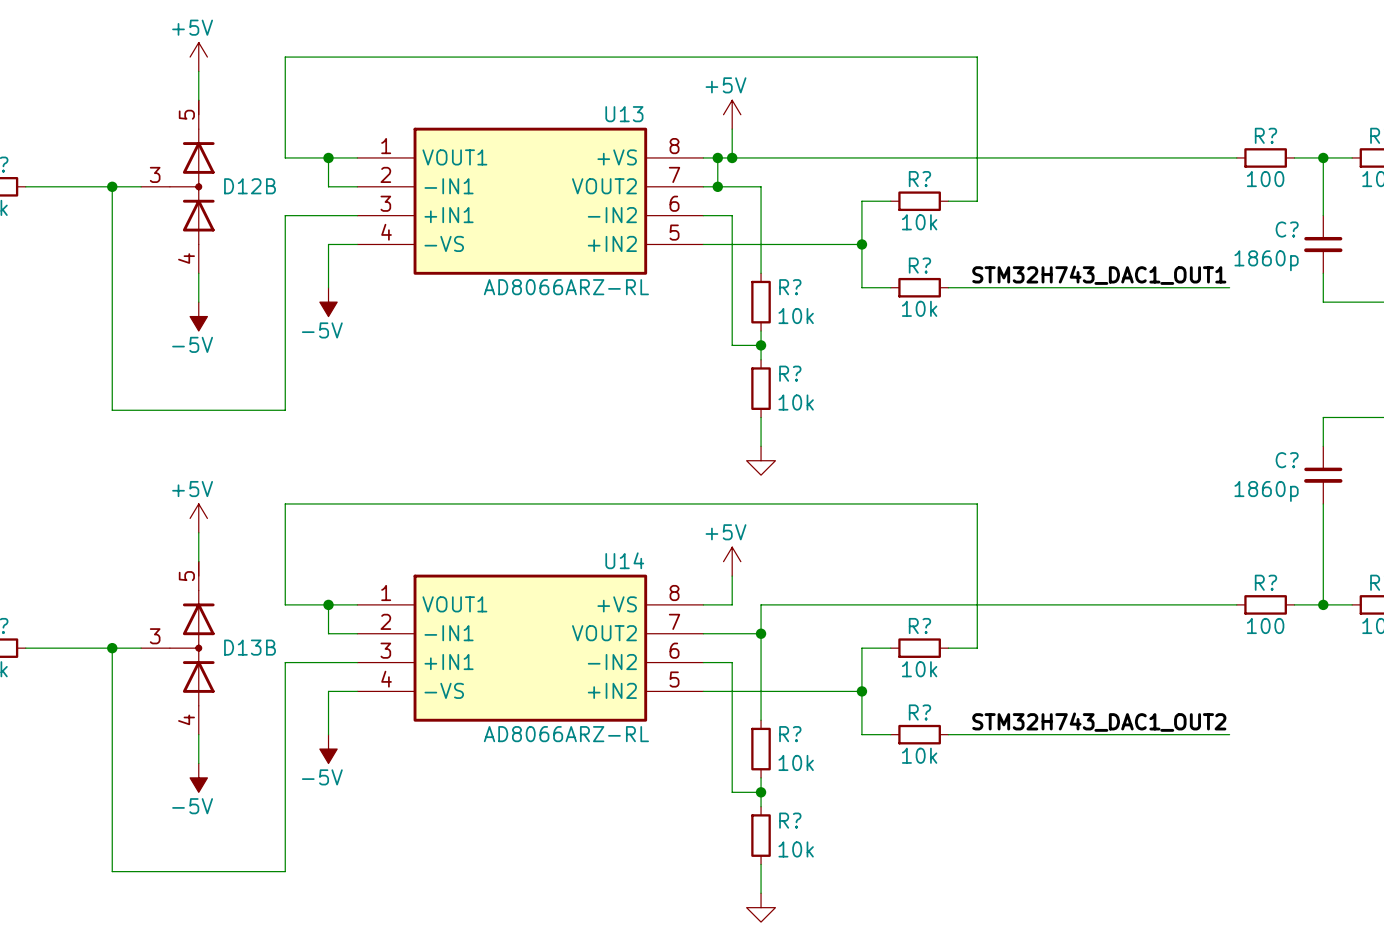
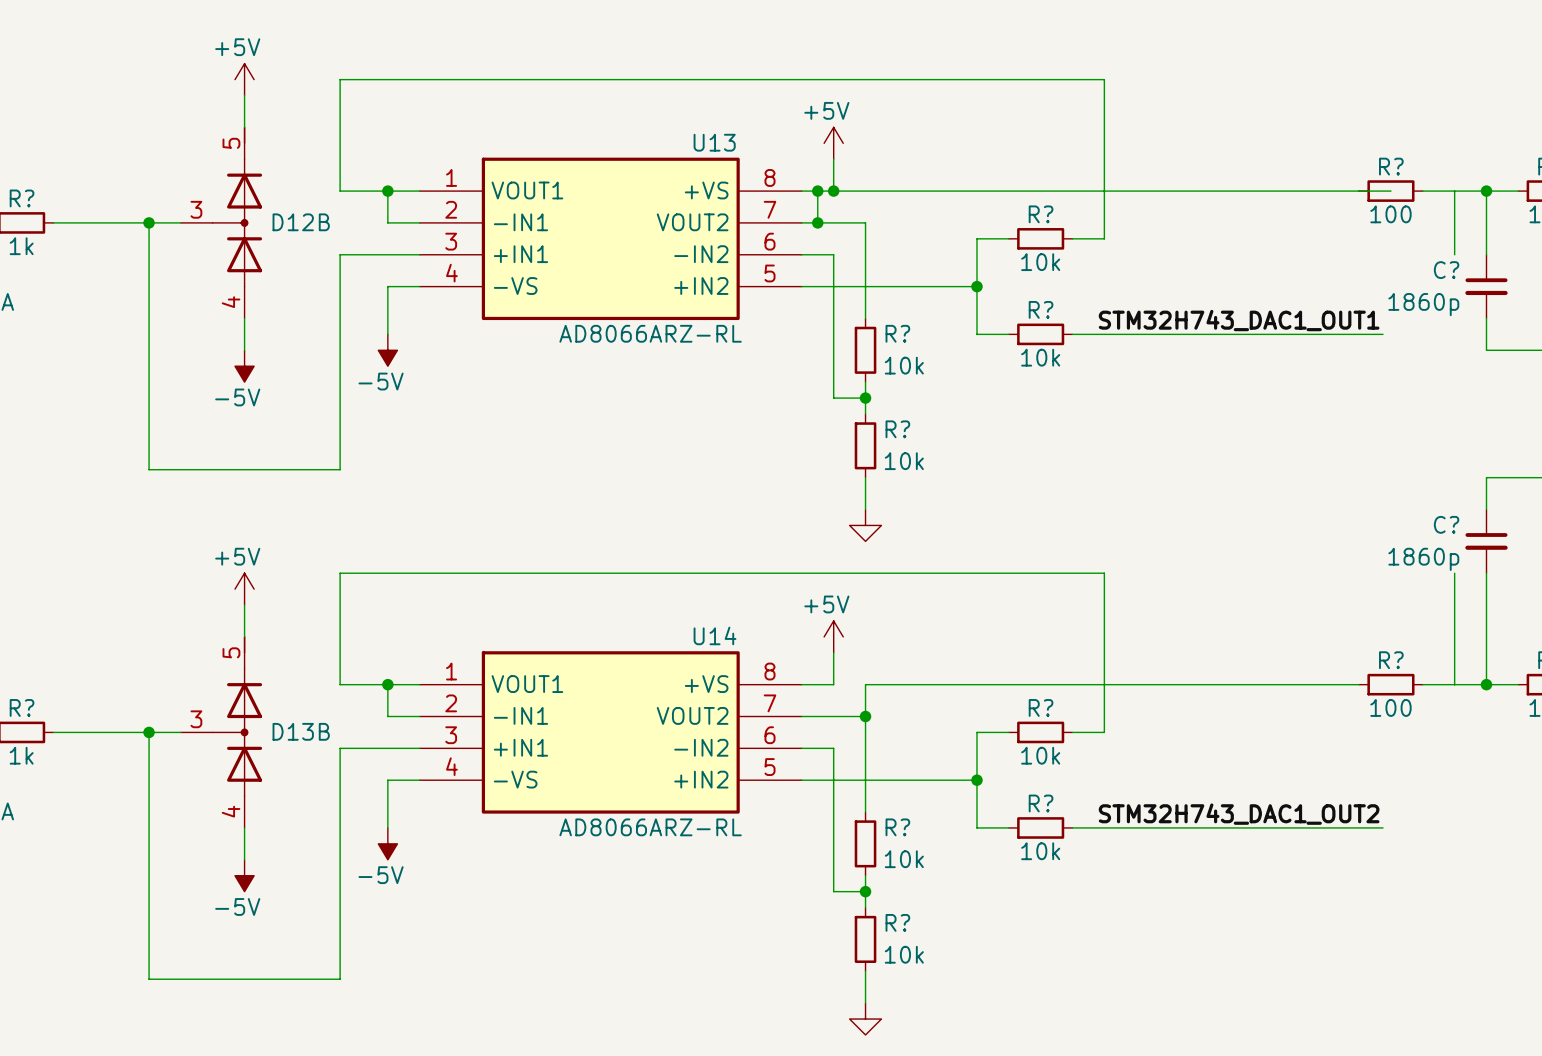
wire: none -> (1422, 191) (1454, 191) (1454, 254)
R? position: (1265, 157) -> (1390, 191)
wire: none -> (1454, 573) (1454, 684) (1422, 684)
wire: (1207, 604) (1236, 604) -> none
R? position: (1265, 604) -> (1390, 684)

